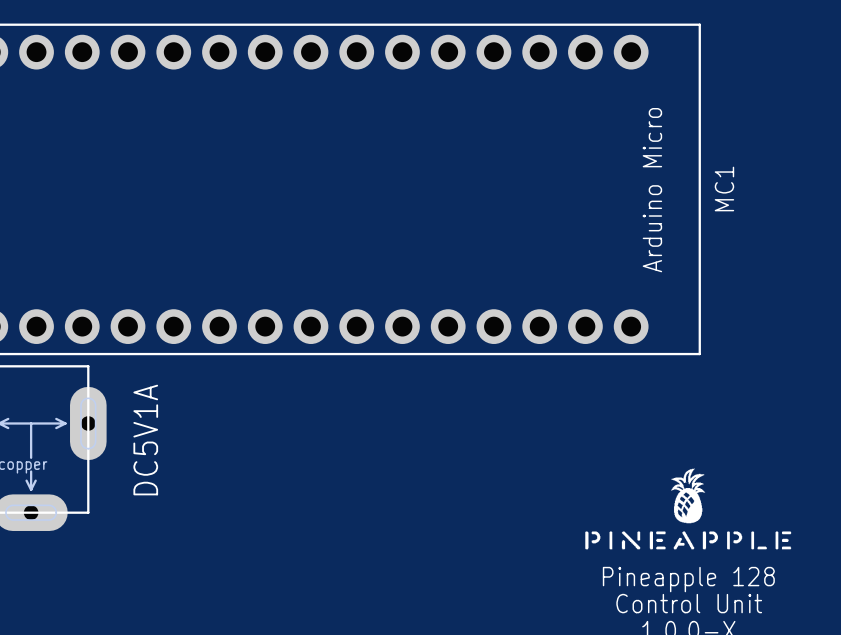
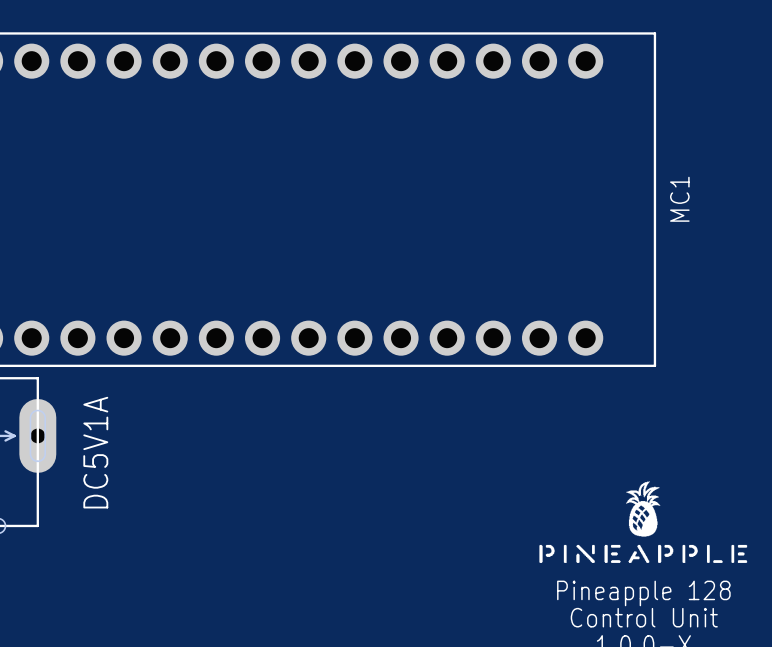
text: Arduino Micro (652, 190) -> none

